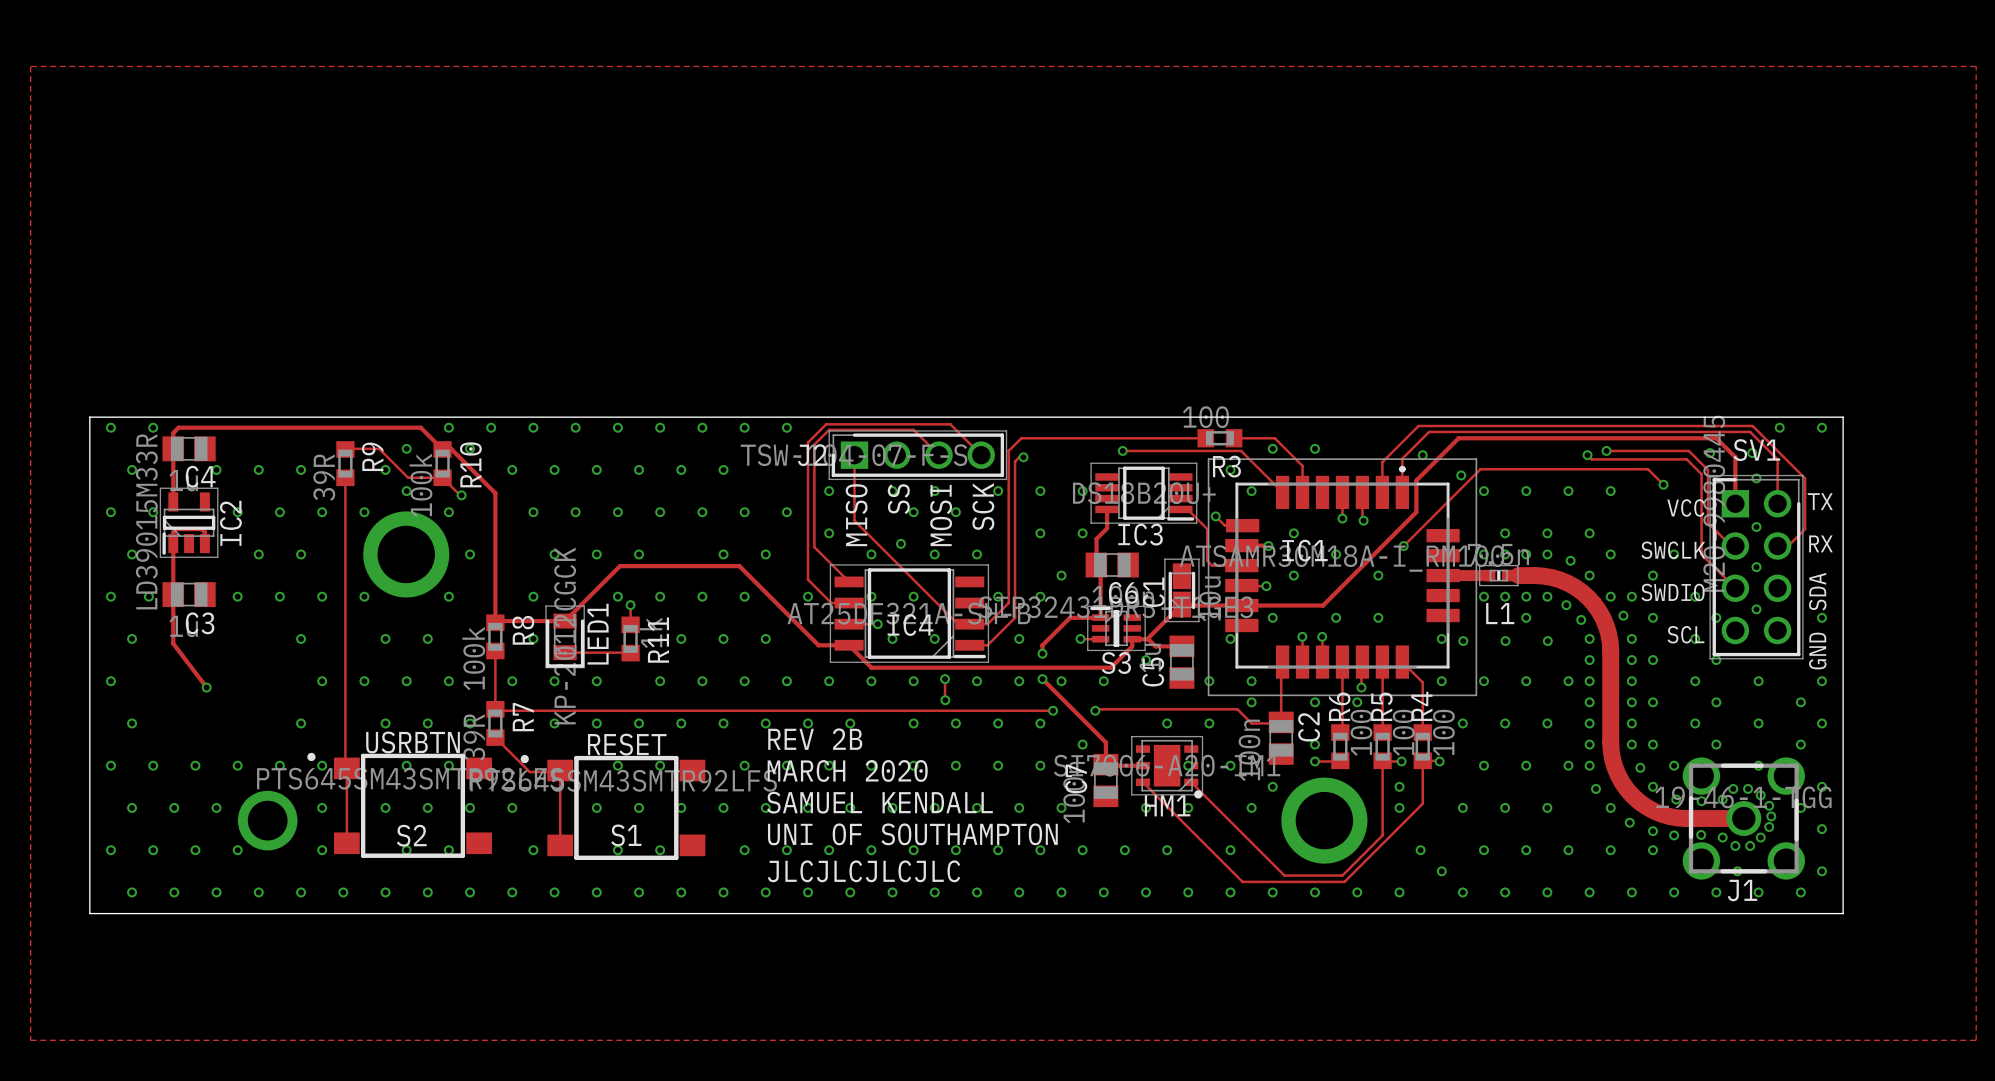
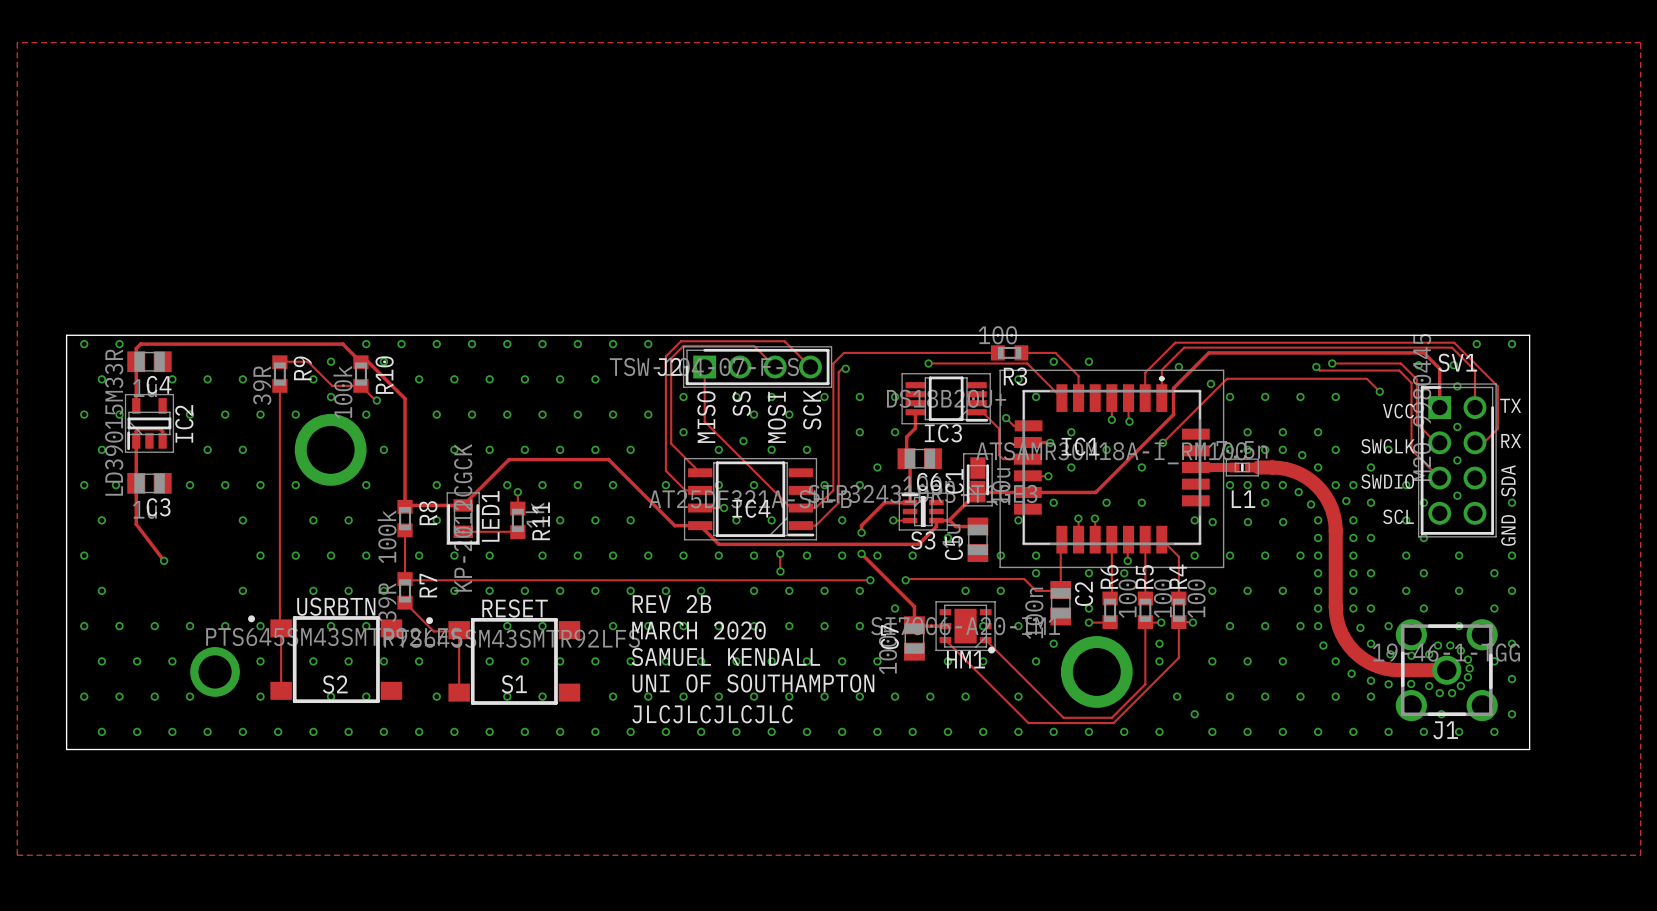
via: none -> (560, 449)

